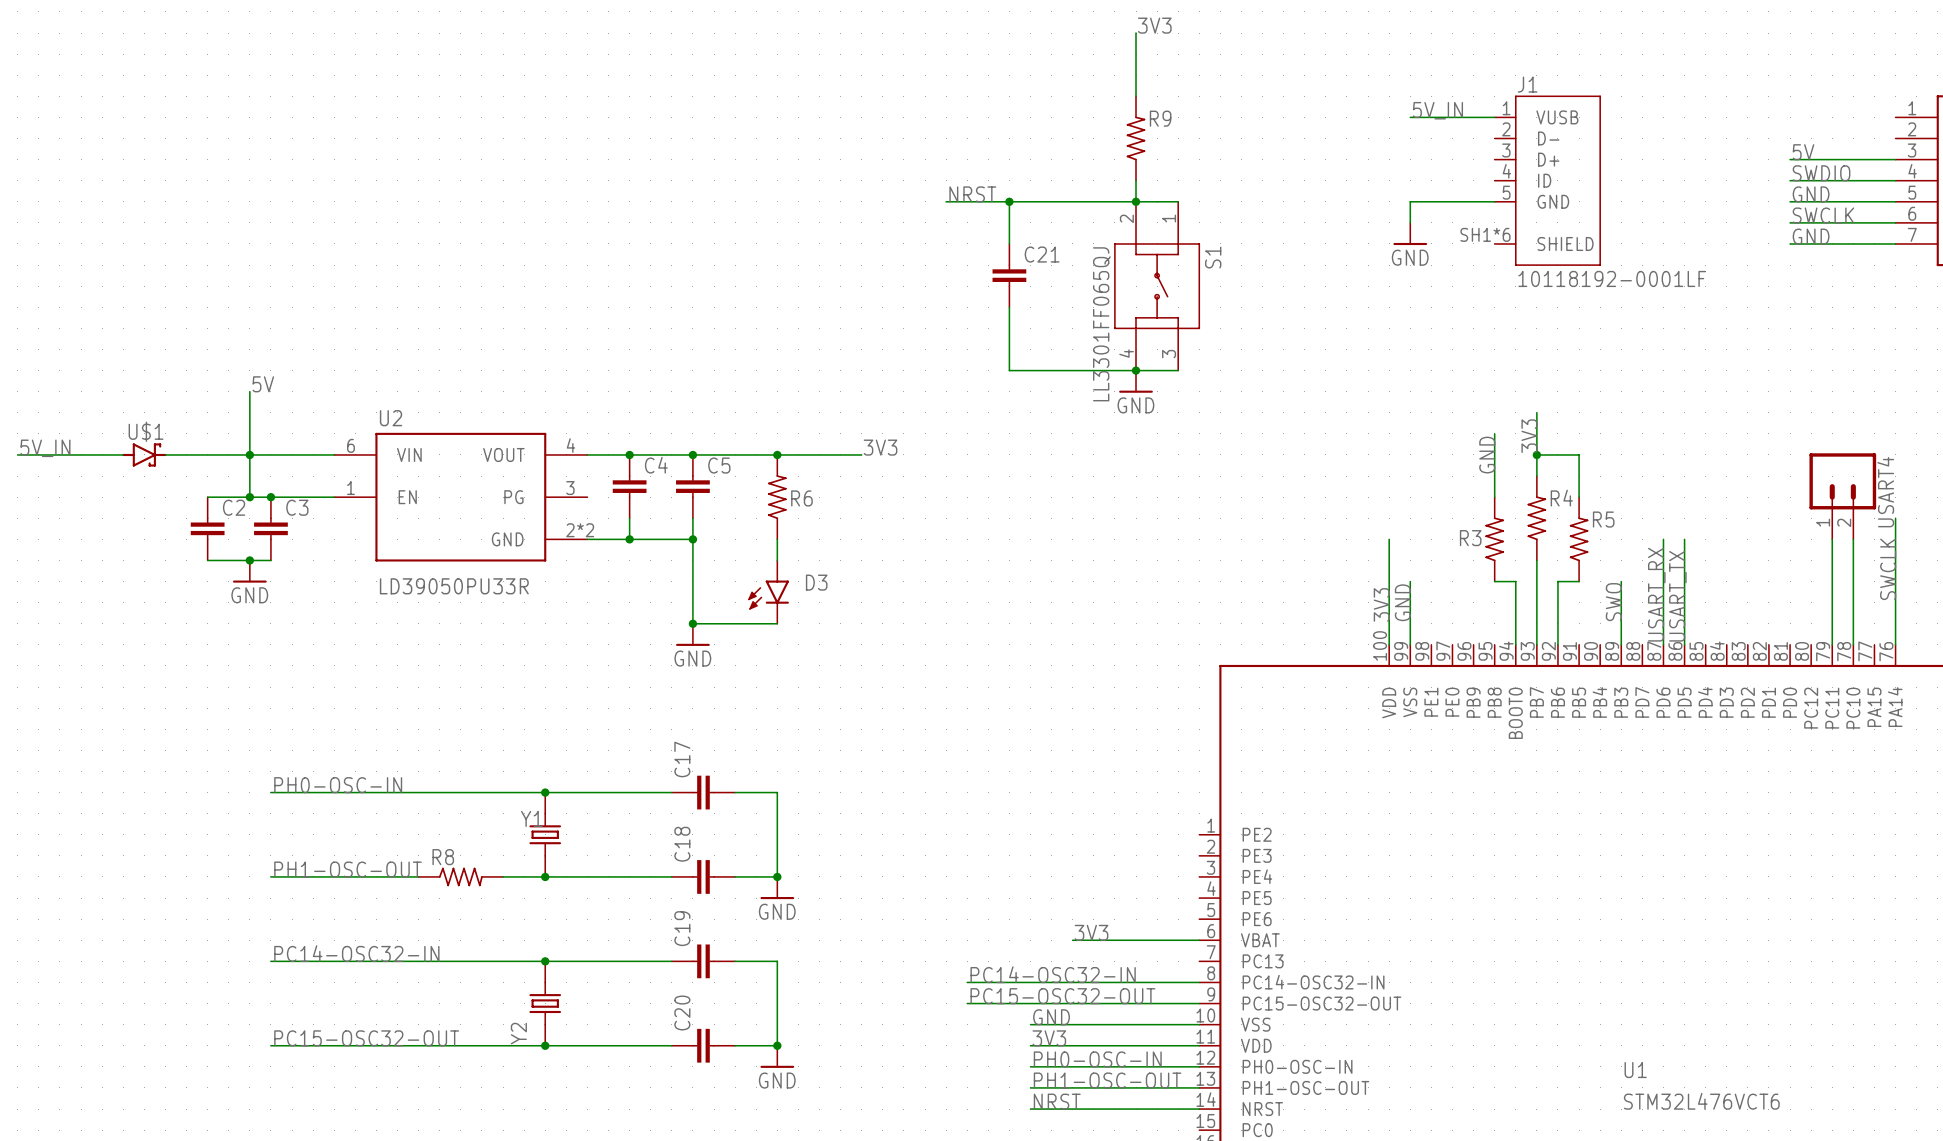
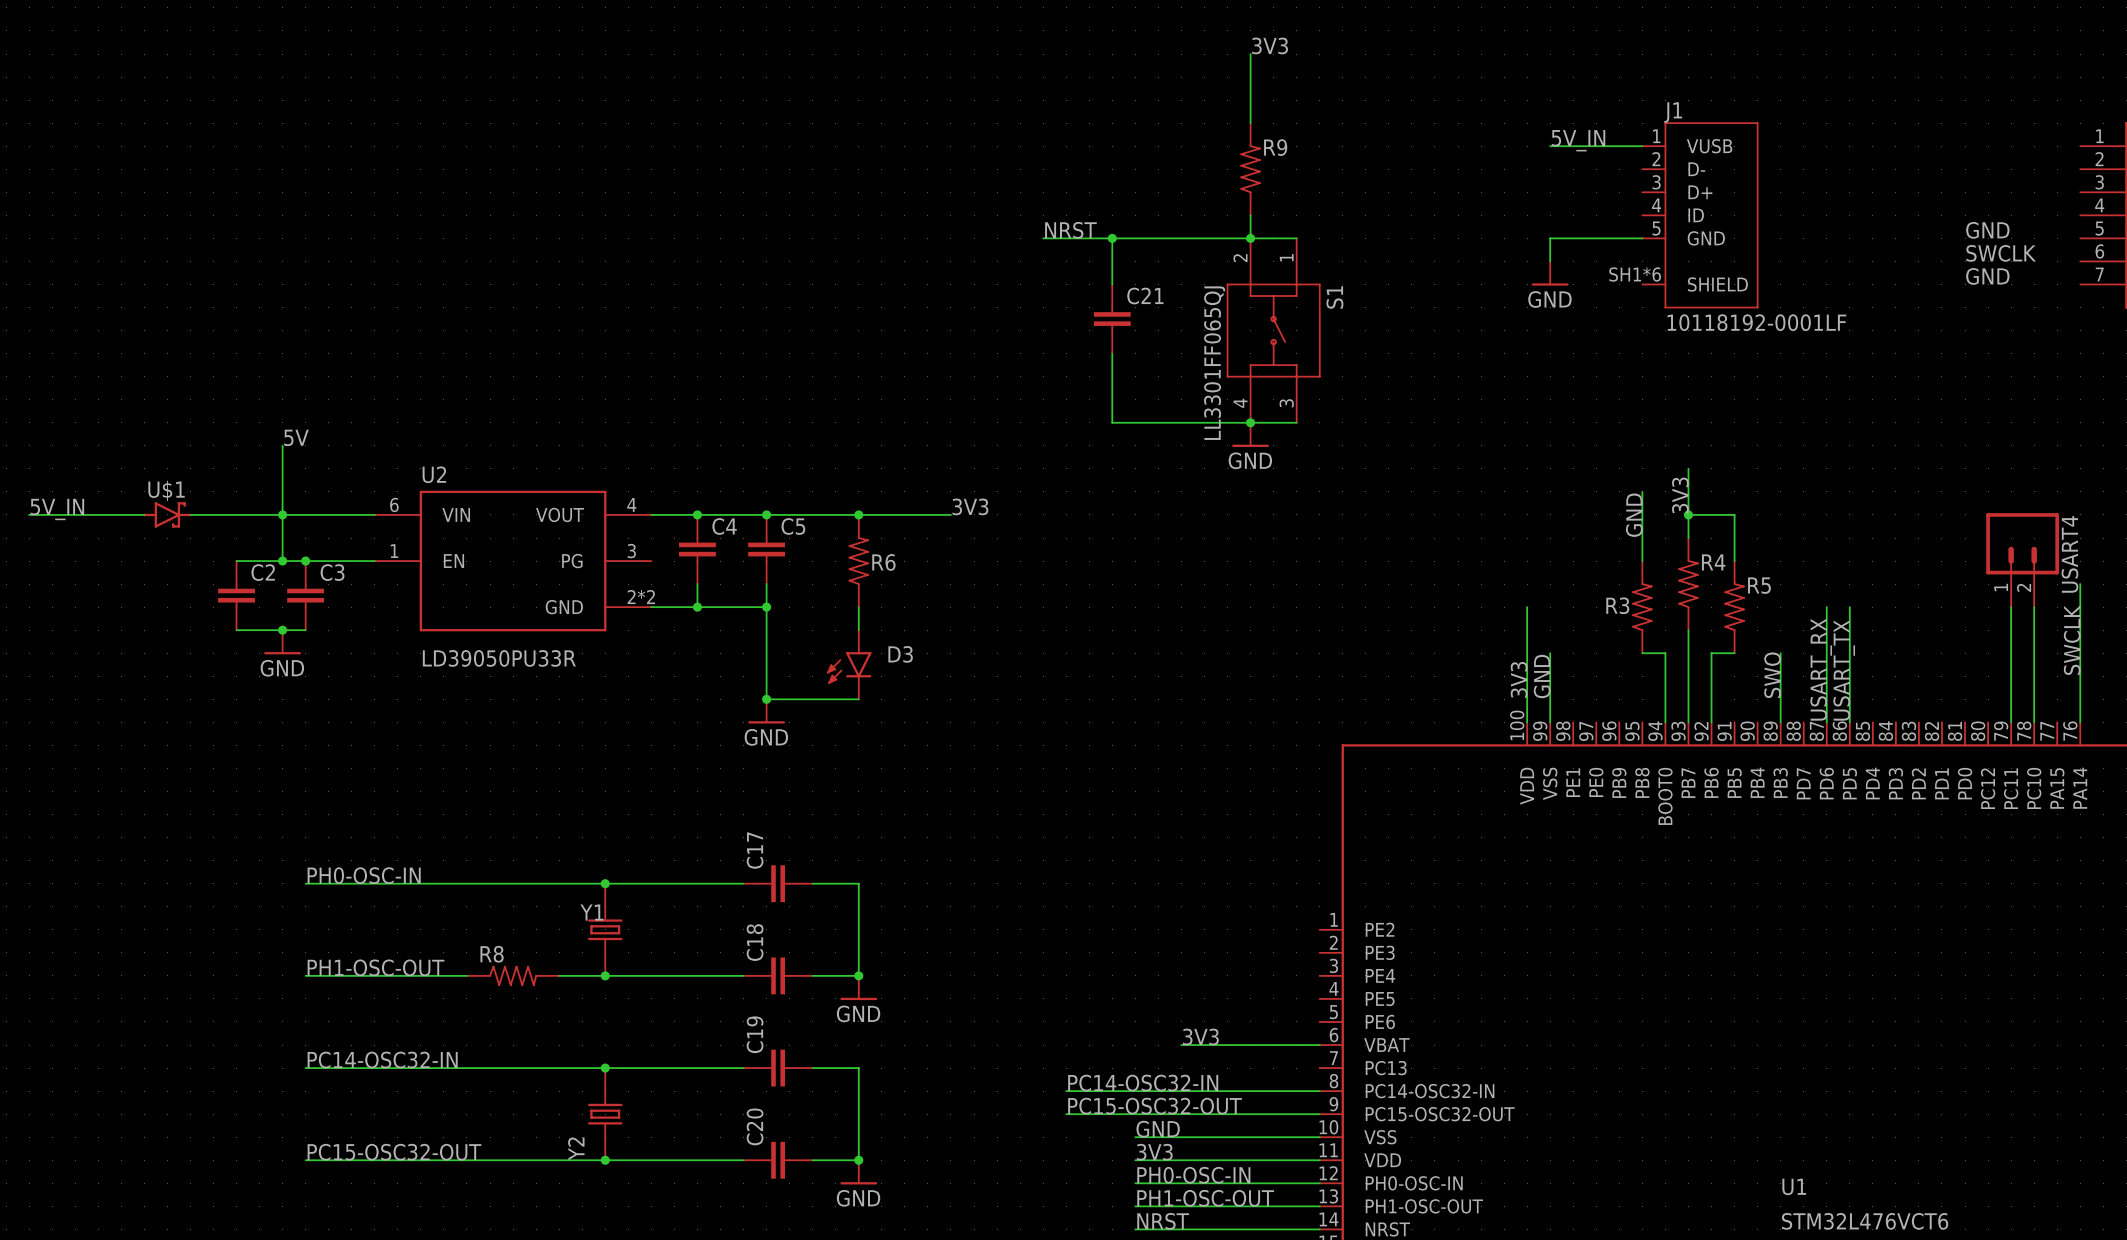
label: 5V (1803, 152) -> none
wire: (1790, 159) (1895, 159) -> none
label: SWDIO (1821, 173) -> none
wire: (1790, 180) (1895, 180) -> none
wire: (1790, 201) (1895, 201) -> none
wire: (1790, 222) (1895, 222) -> none
wire: (1790, 243) (1895, 243) -> none

